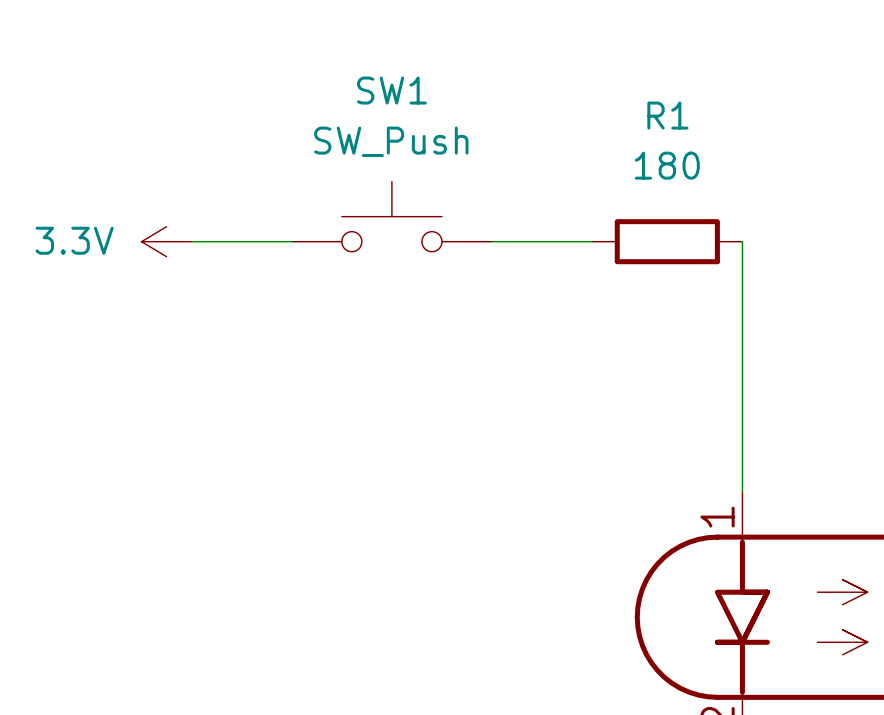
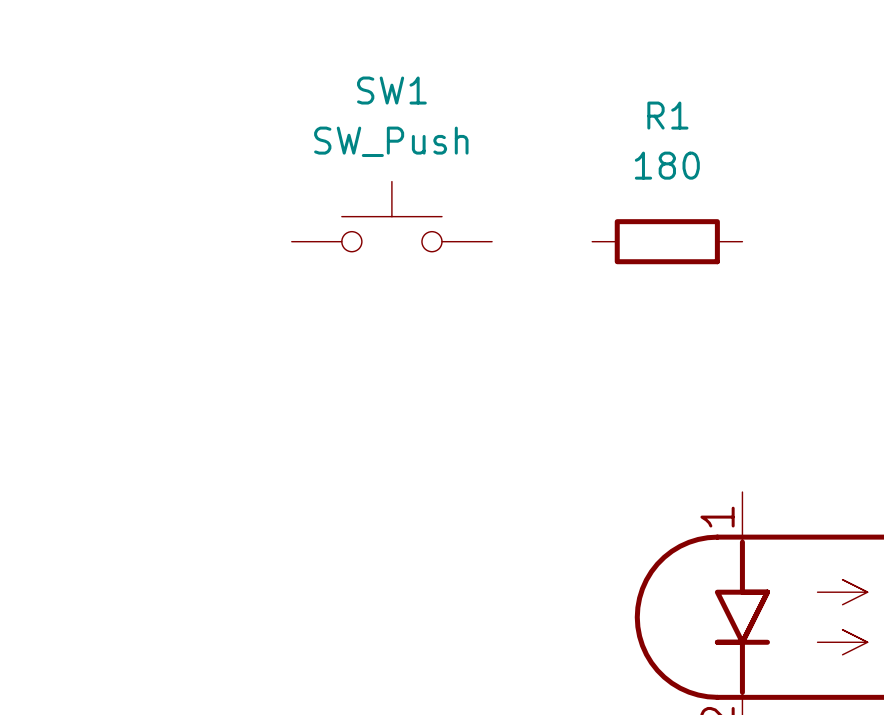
power symbol: 3.3V (166, 241) -> none
wire: (191, 241) (291, 241) -> none
wire: (492, 241) (592, 241) -> none
wire: (742, 241) (742, 492) -> none

